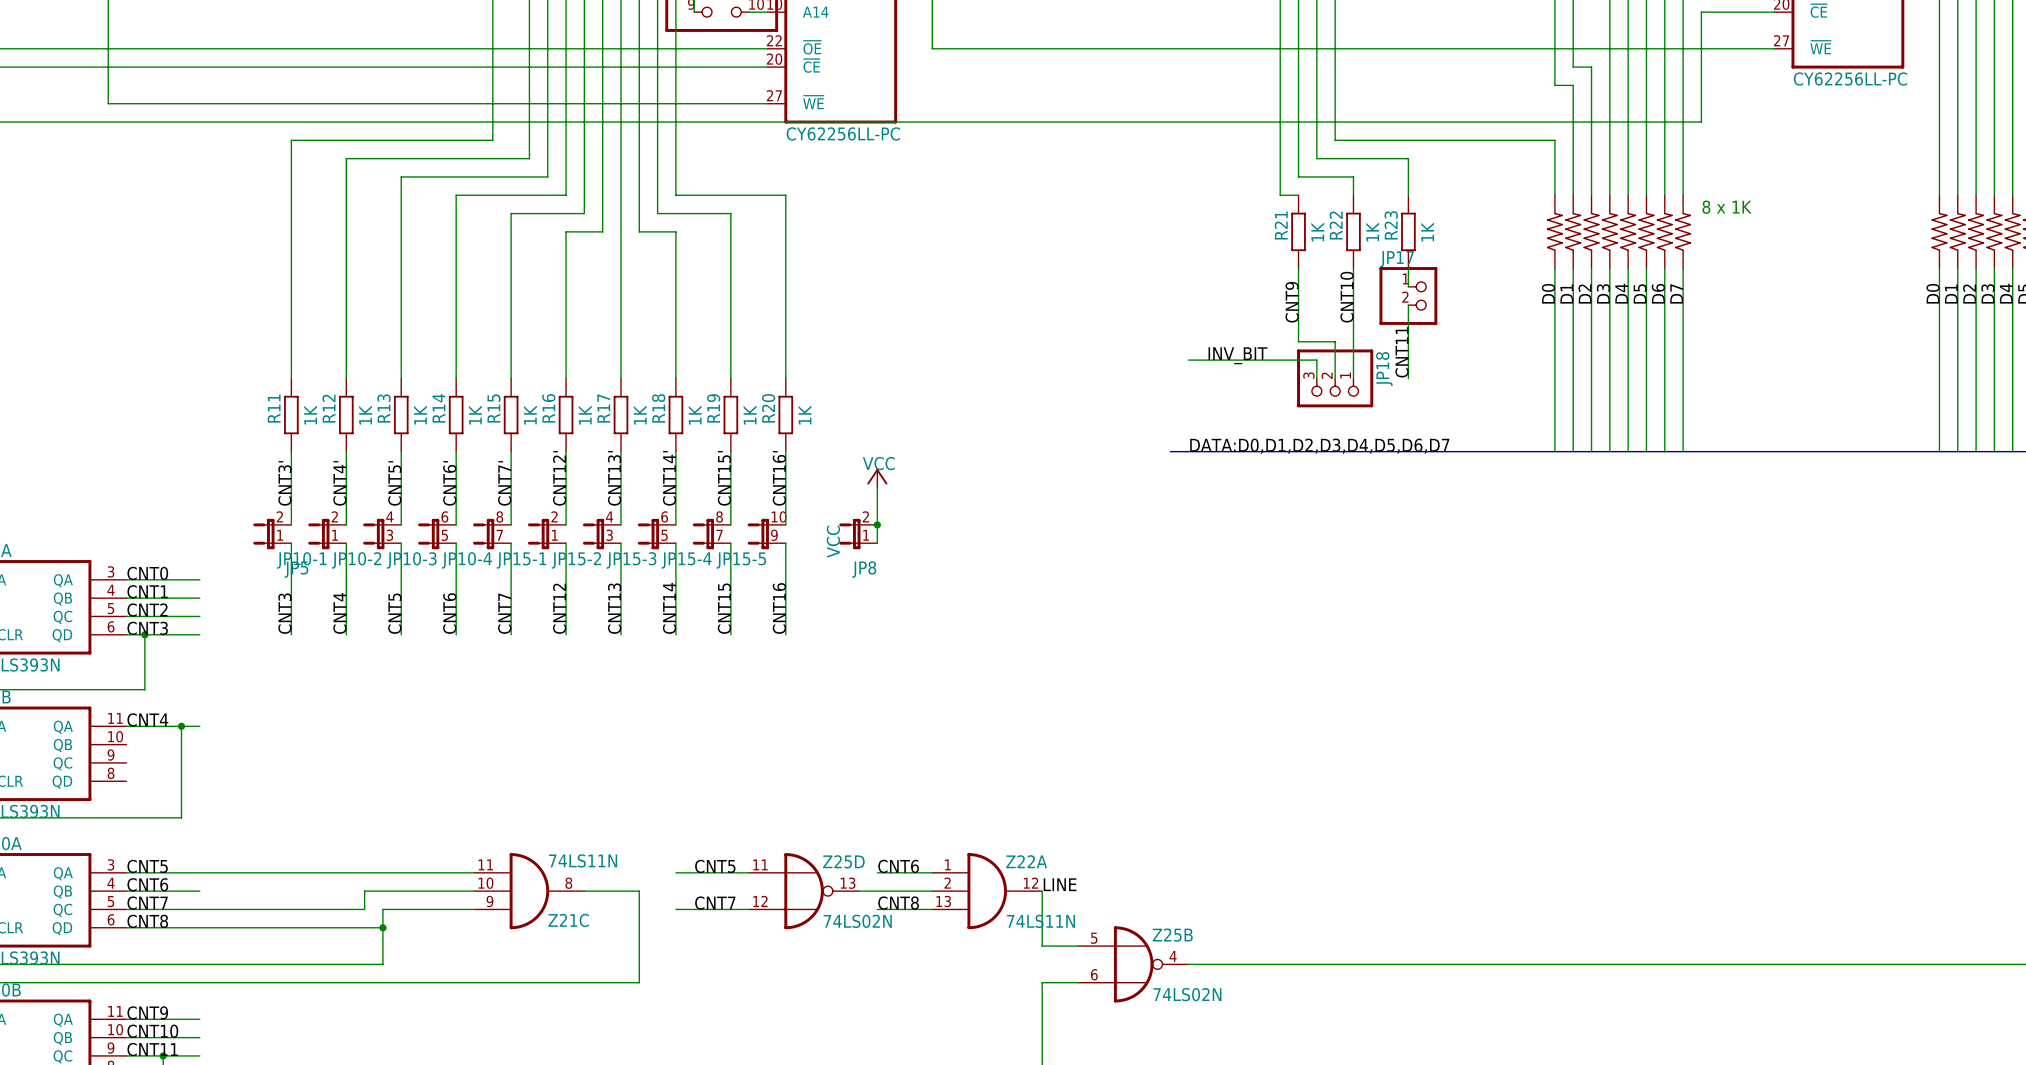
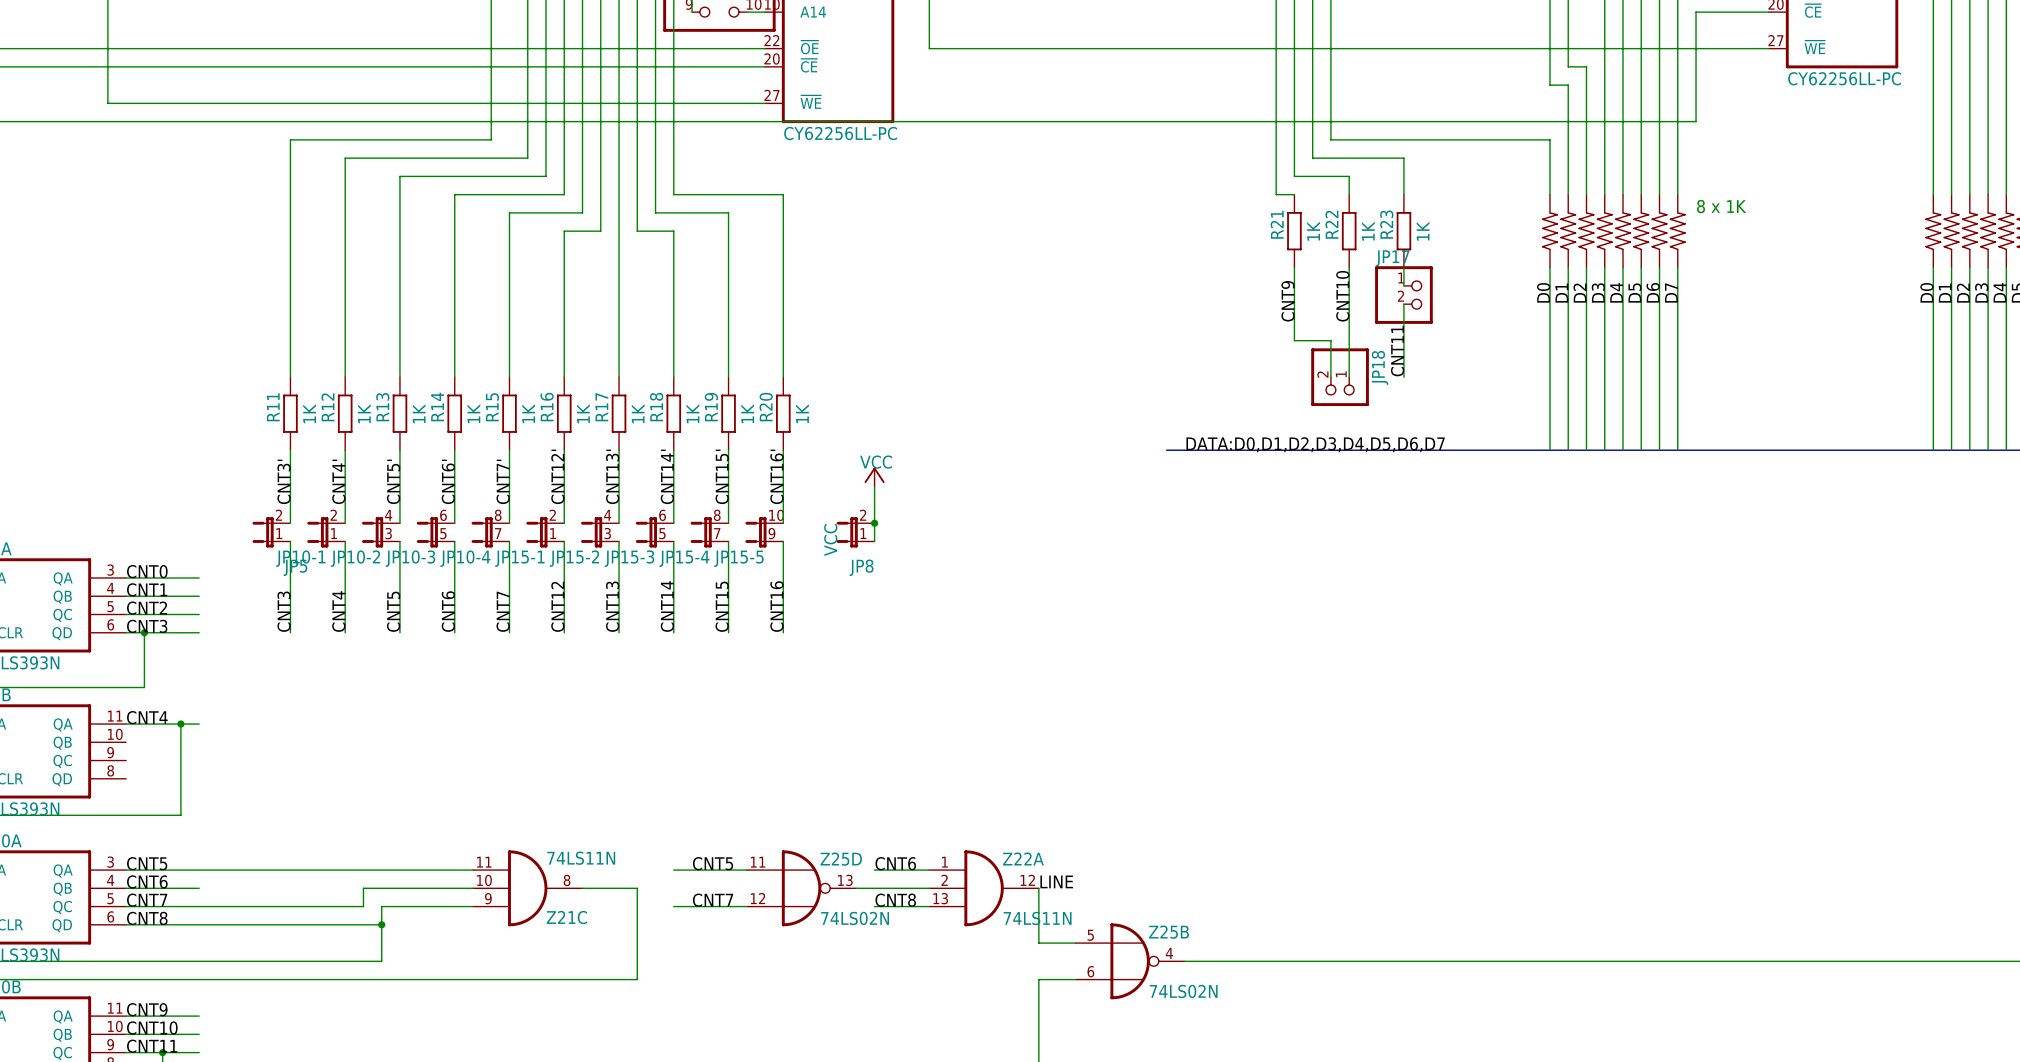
JP18 symbol: [1297, 349, 1374, 408] -> [1311, 348, 1369, 407]
label: INV_BIT (1237, 355) -> none
wire: (1188, 360) (1316, 360) (1316, 378) -> none

